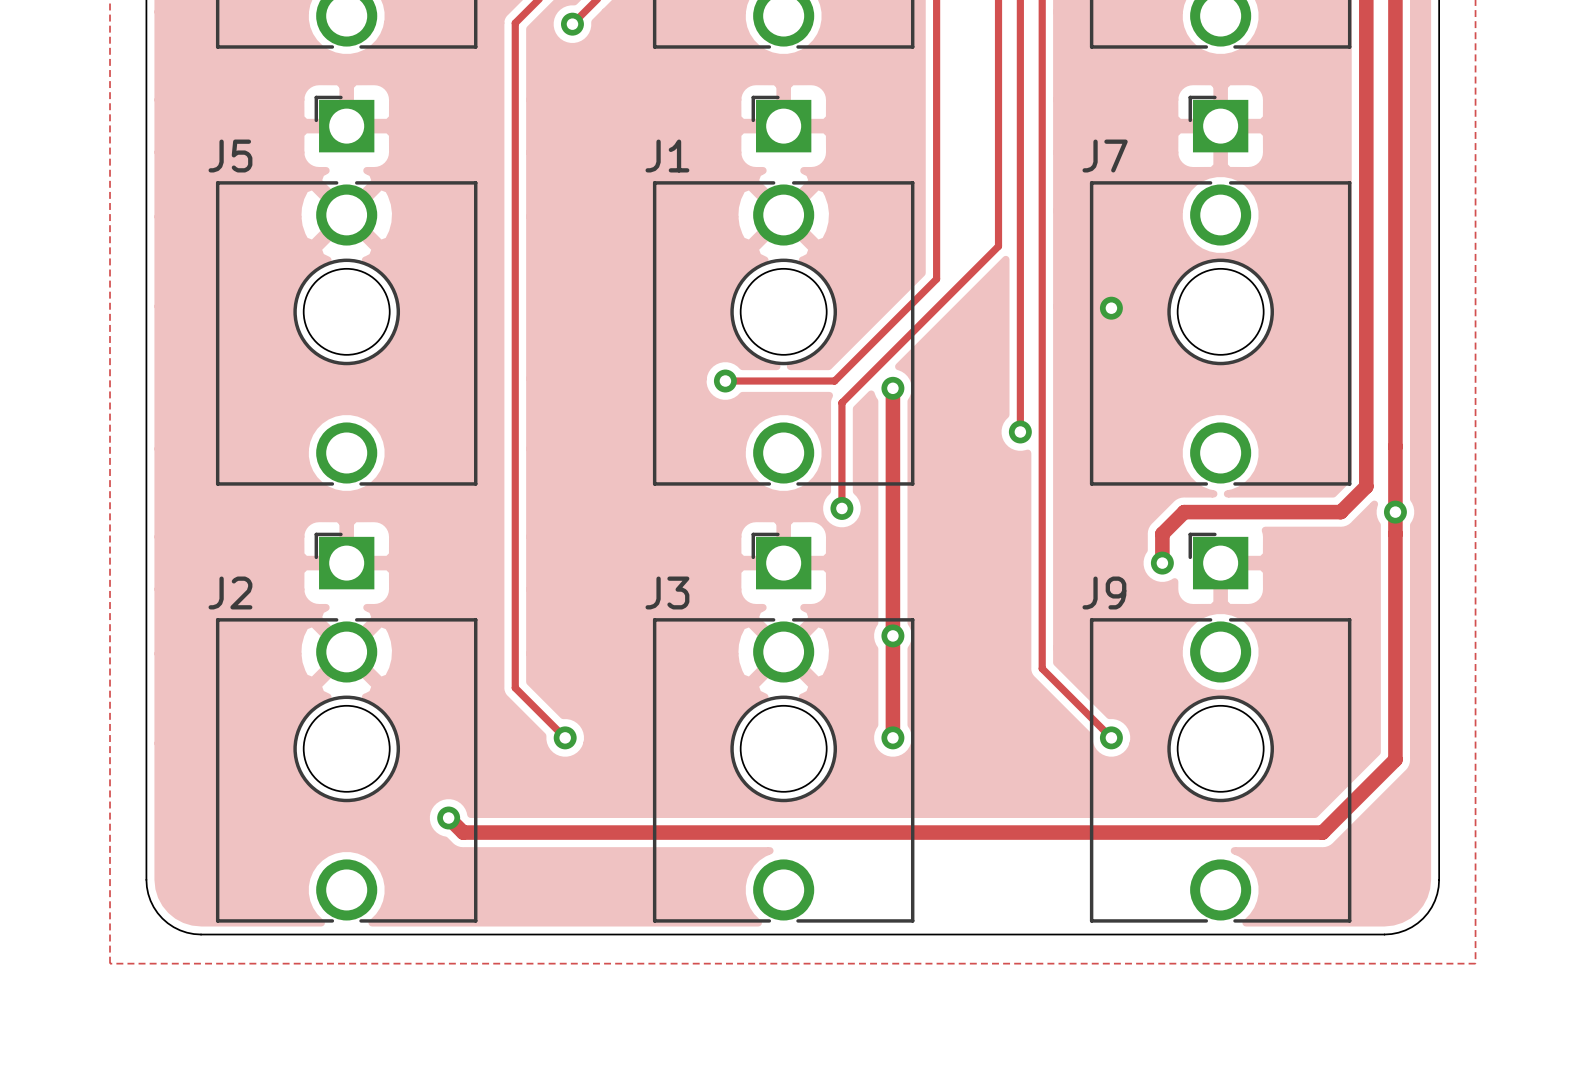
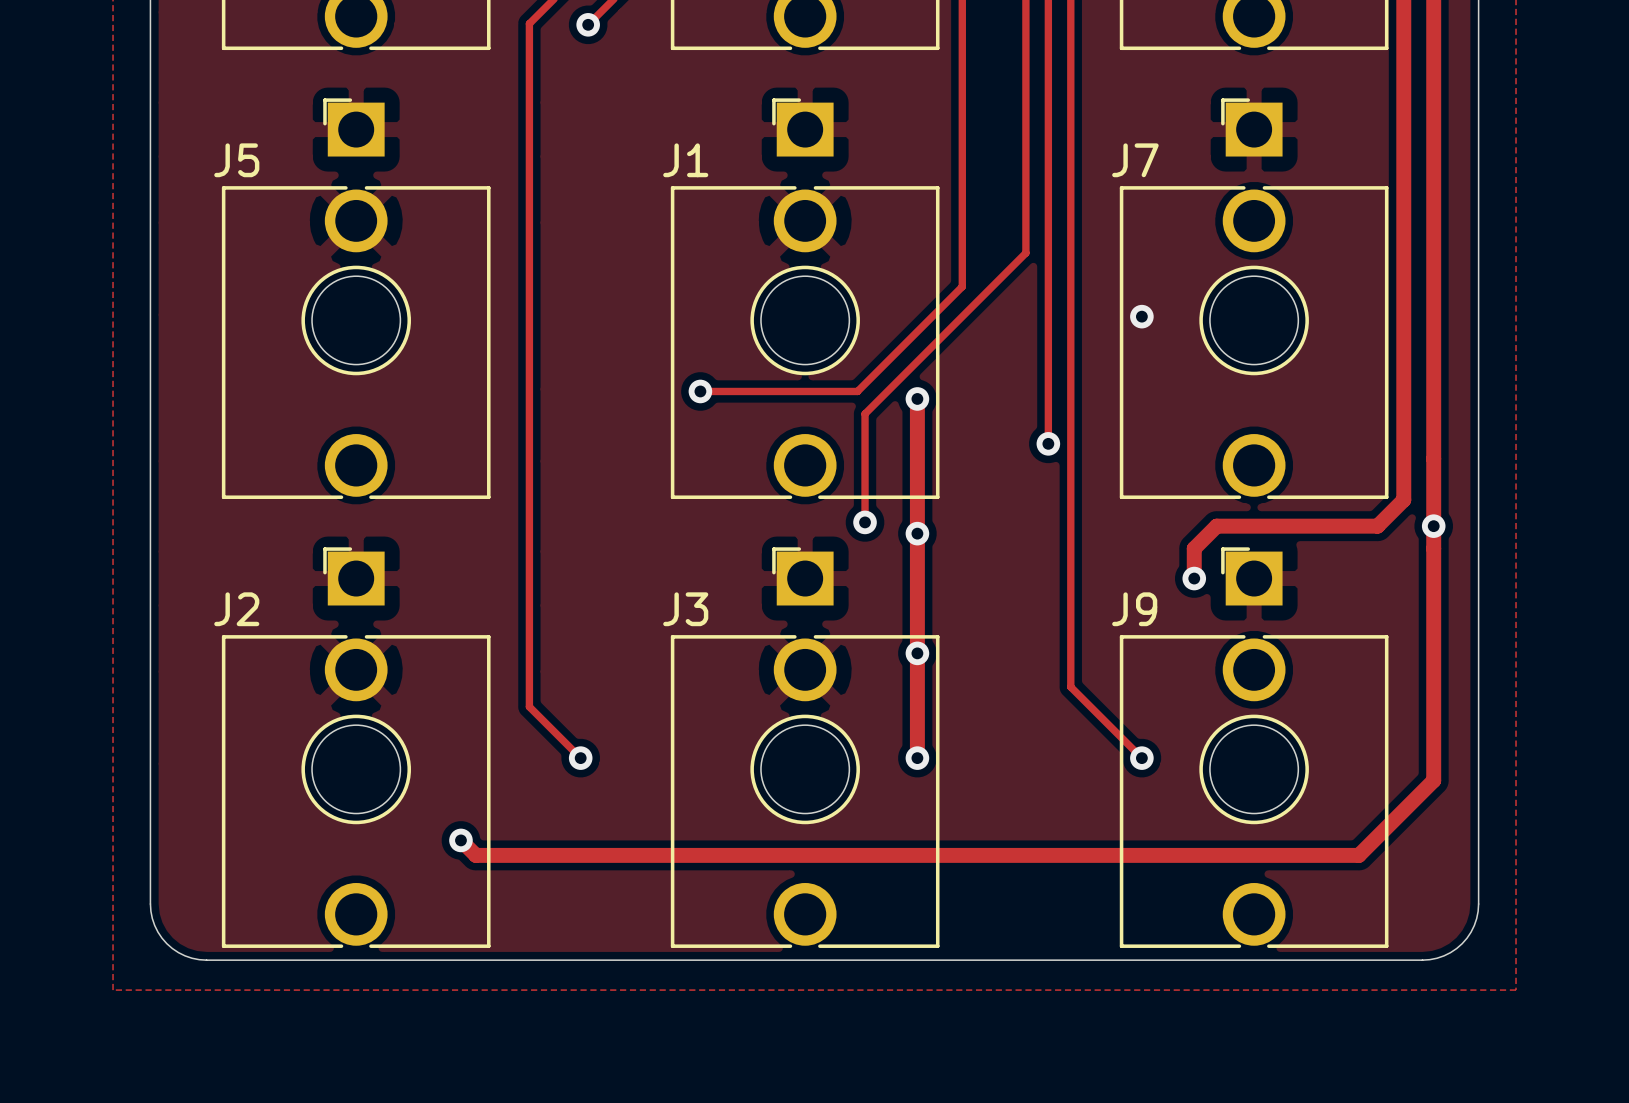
track: none -> (700, 391) (745, 391)
via position: (725, 381) -> (700, 391)
via: none -> (917, 533)

